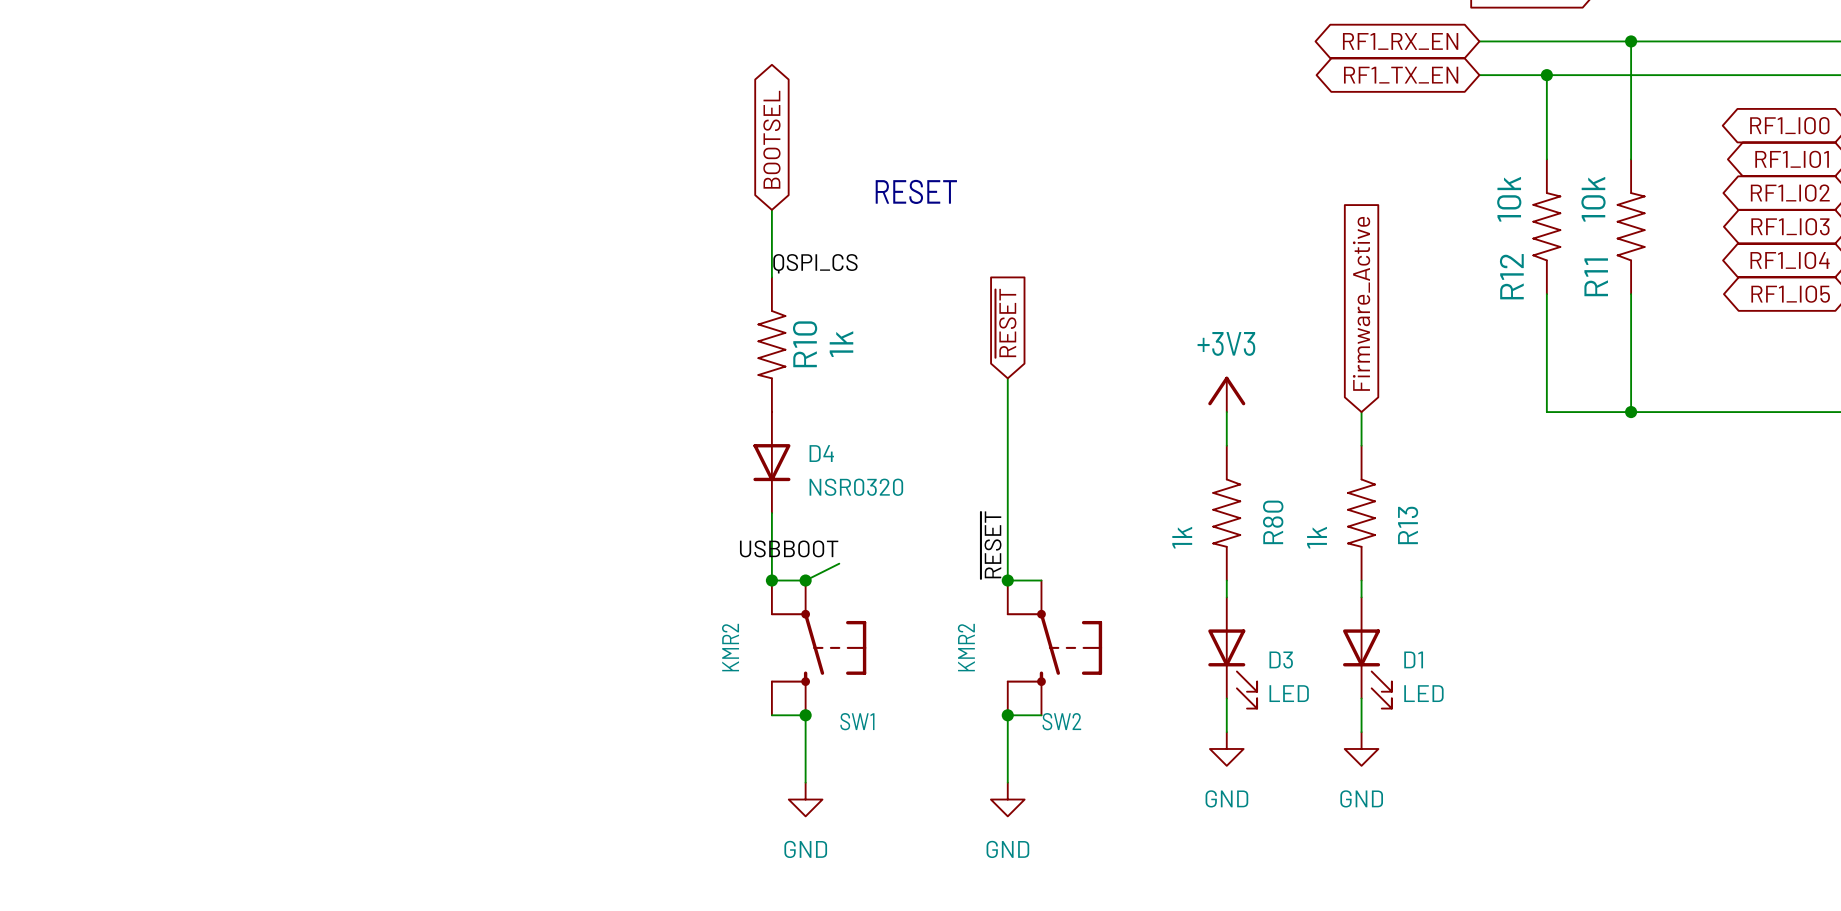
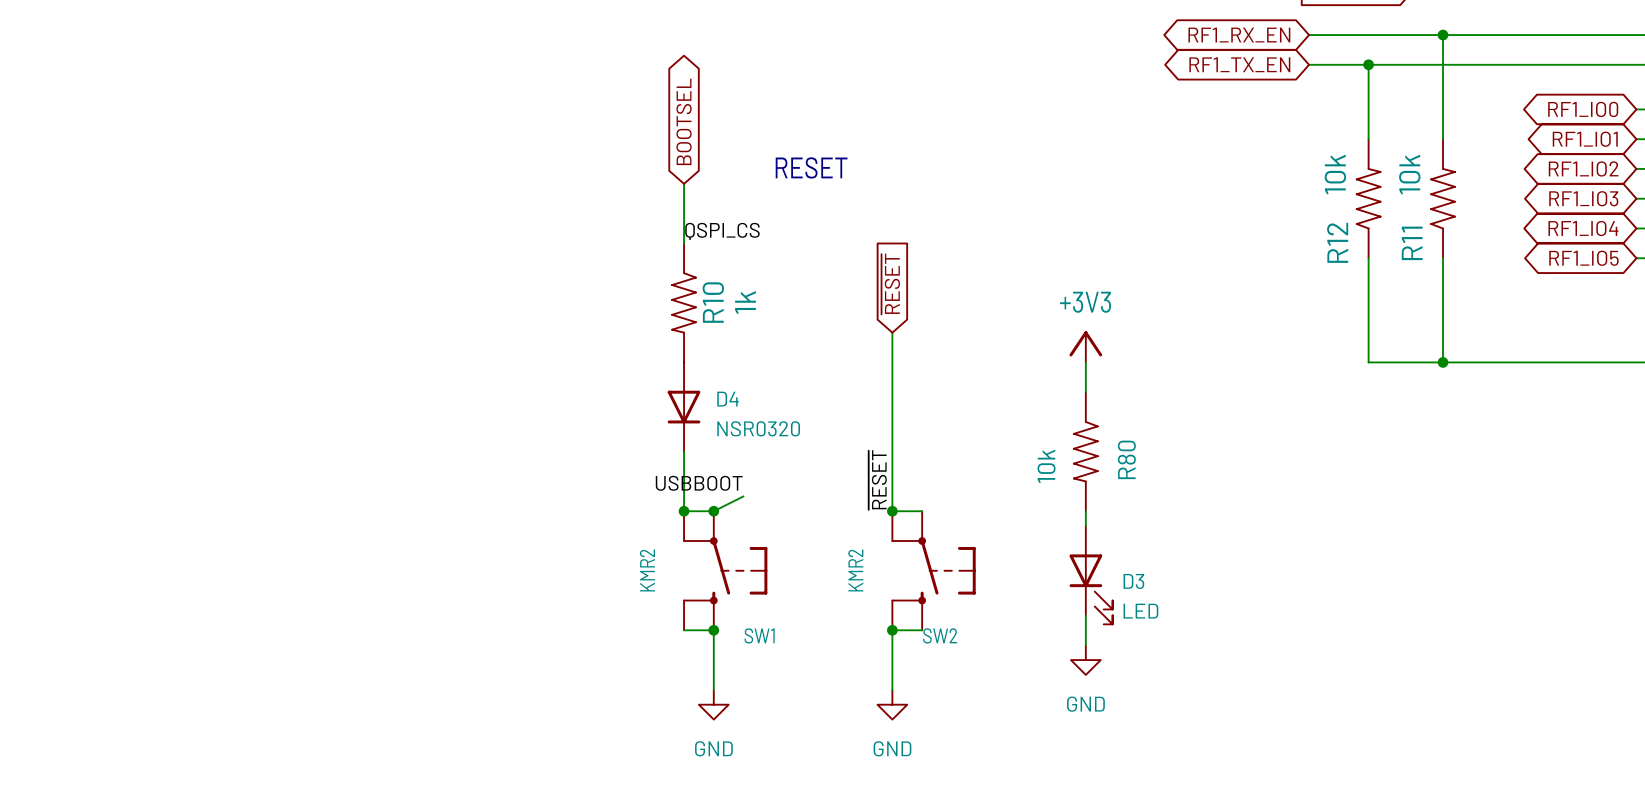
global label: Firmware_Active (1361, 303) -> none
wire: (1361, 412) (1361, 445) -> none
R13: 1k (1361, 513) -> none
R80 value: 1k (1182, 537) -> 10k (1046, 466)
wire: (1361, 580) (1361, 597) -> none
D1: LED (1367, 652) -> none
wire: (1361, 698) (1361, 732) -> none
power symbol: GND (1361, 748) -> none

